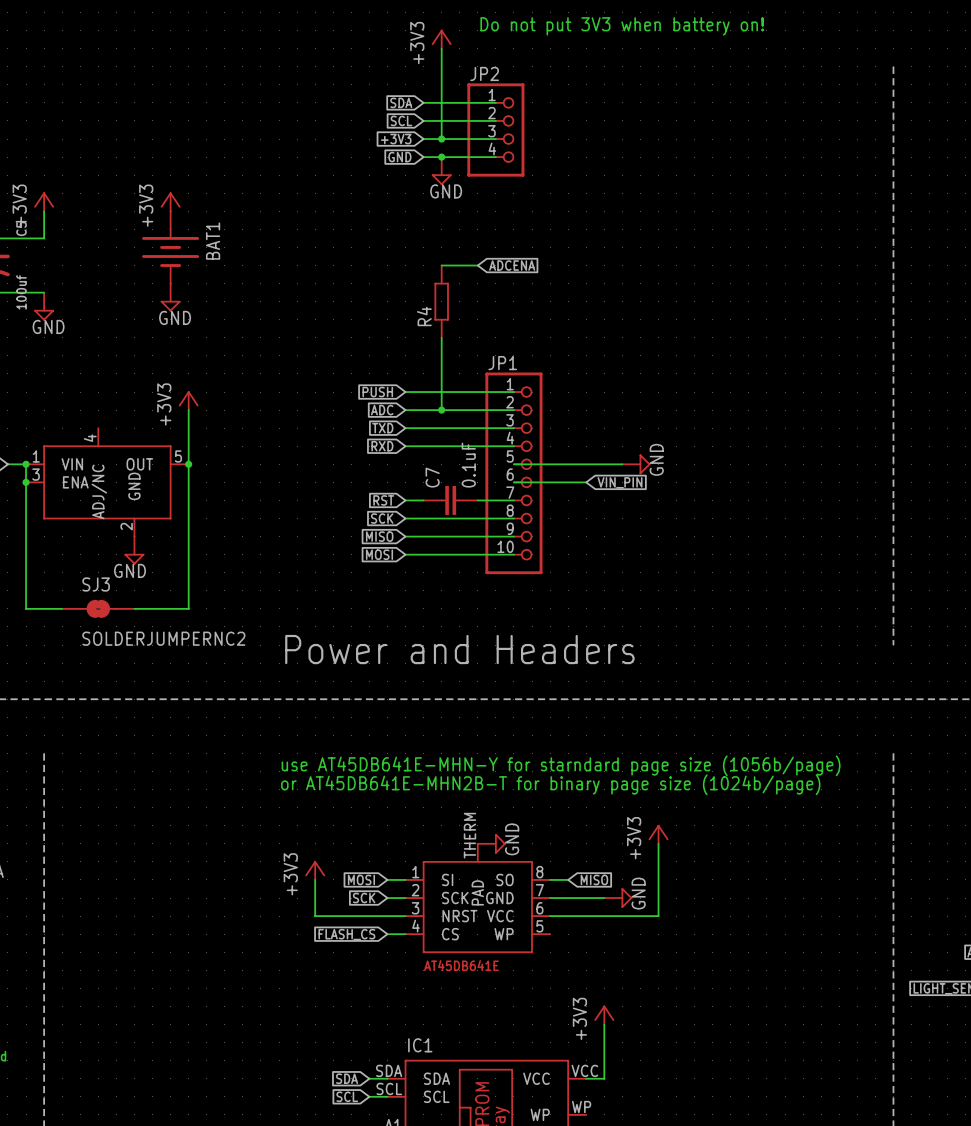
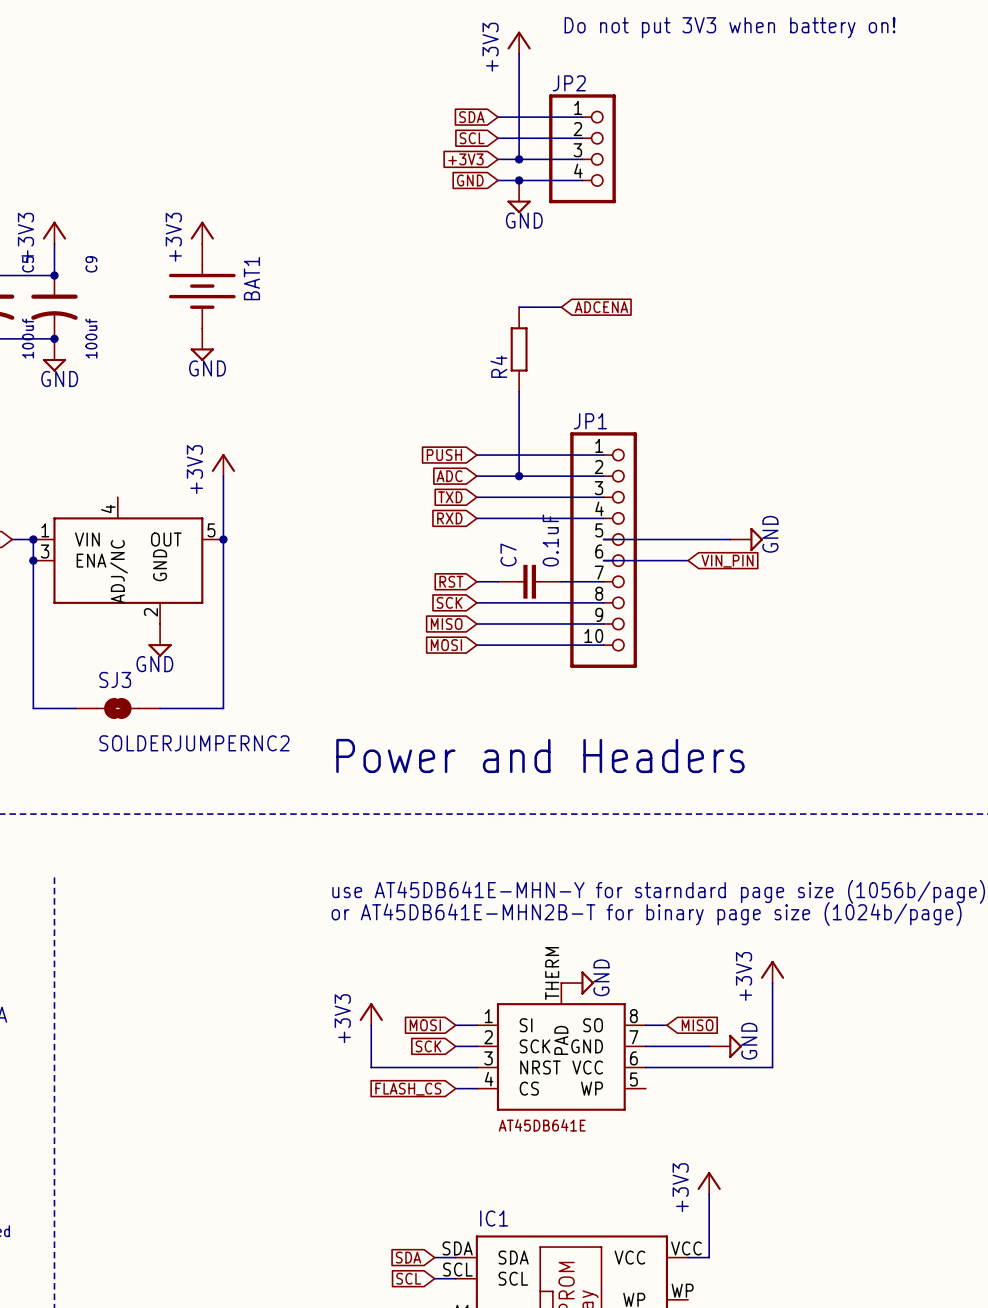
junction: none -> (54, 275)
C9: none -> 100uf (54, 307)
junction: none -> (54, 338)

